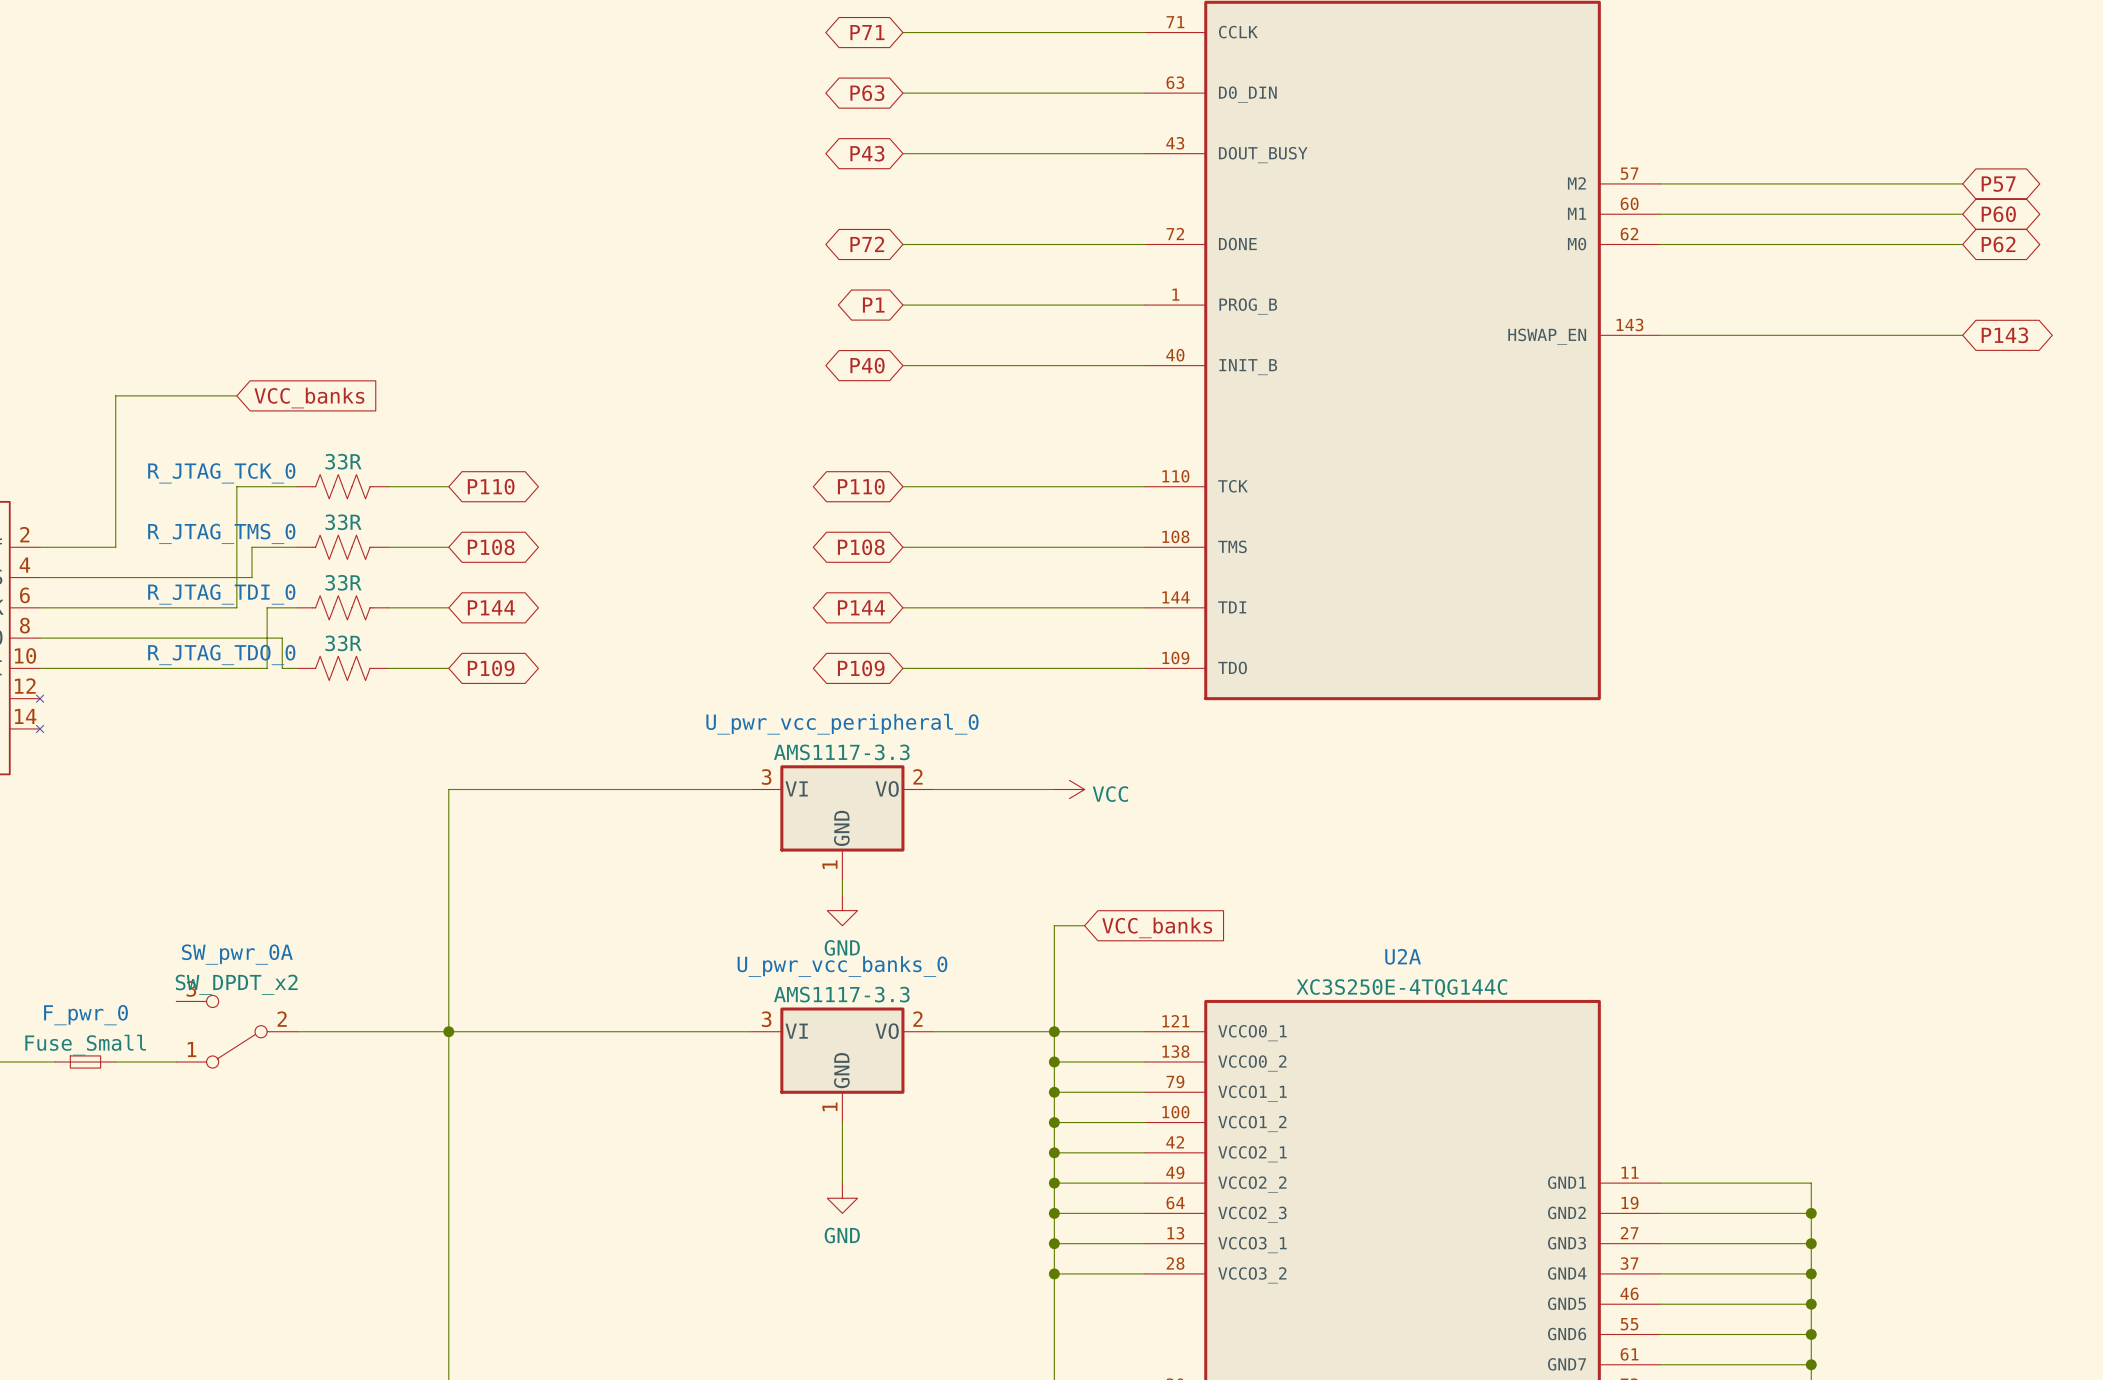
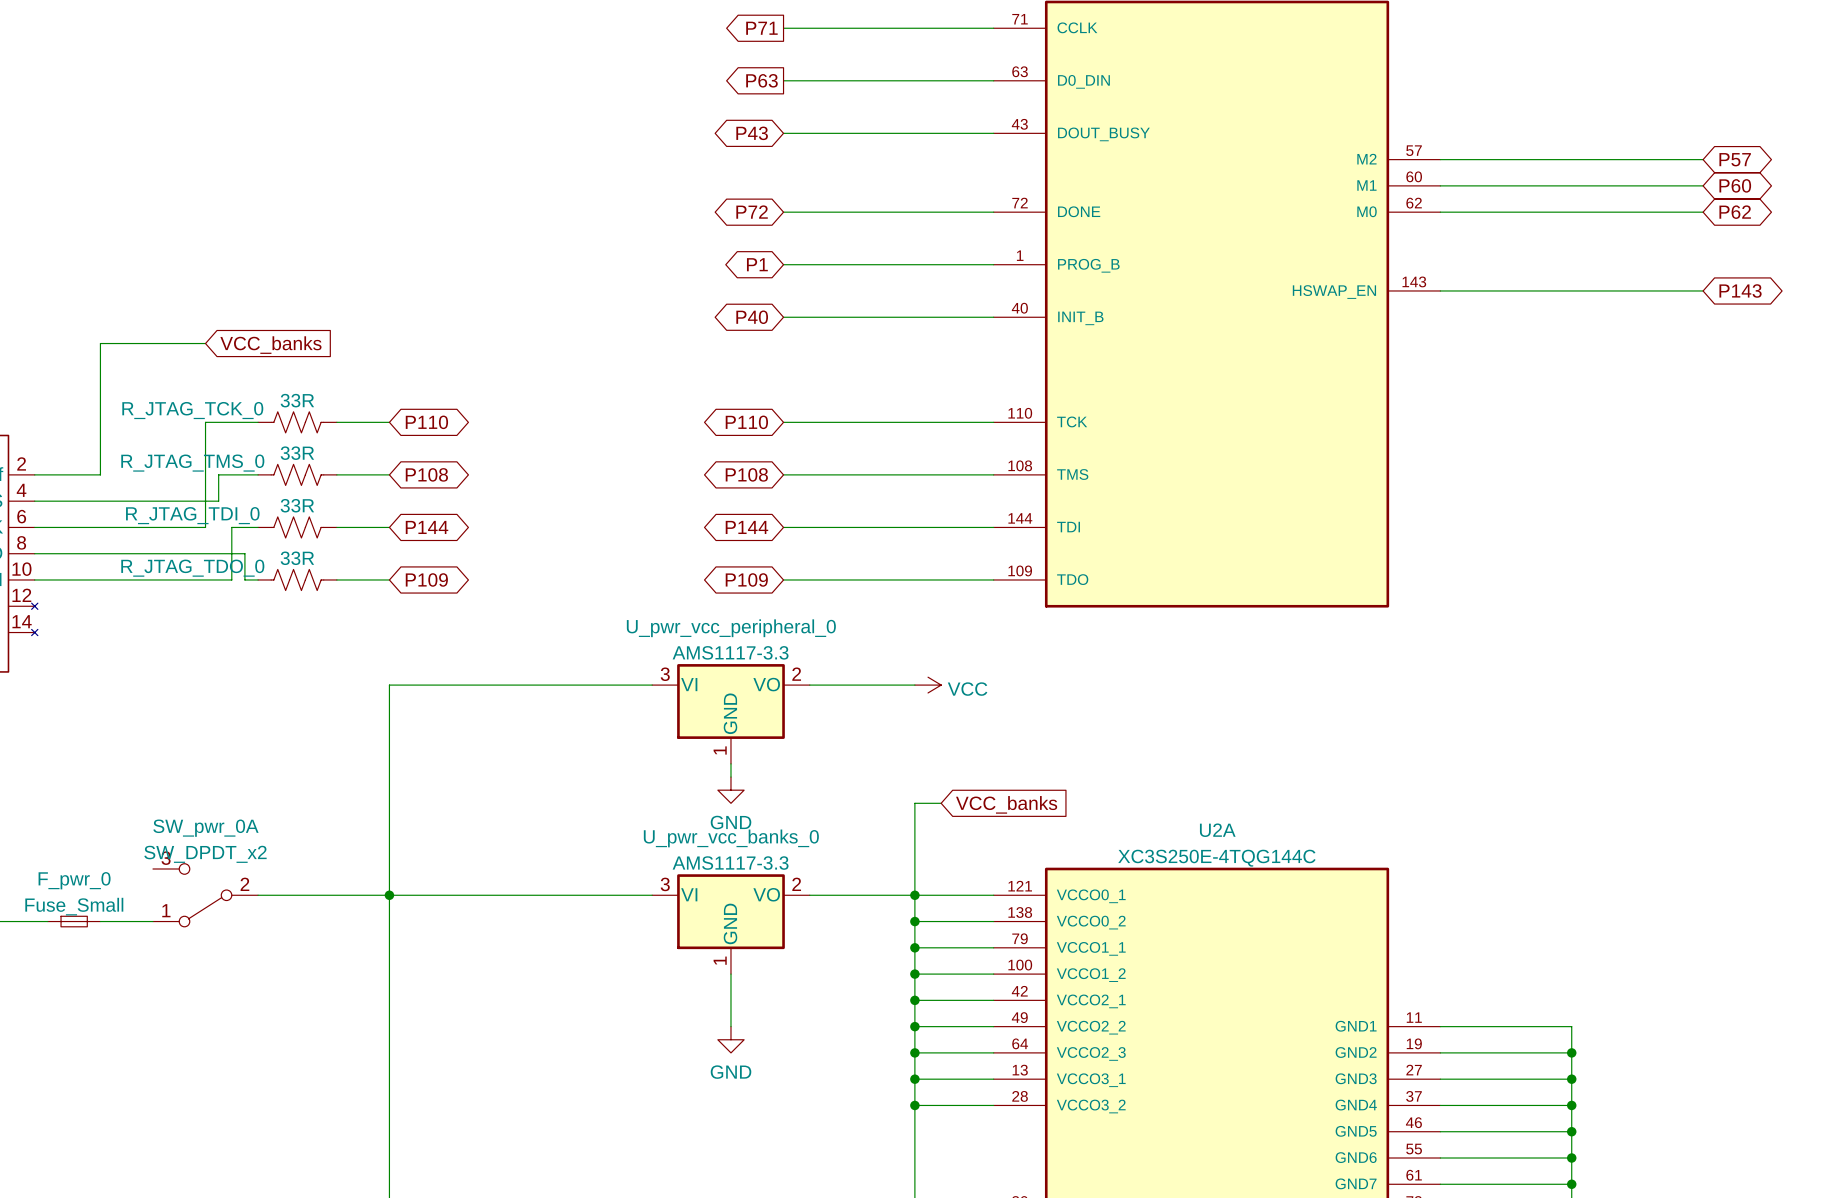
global label shape: bidirectional (867, 32) -> output (761, 28)
global label shape: bidirectional (867, 93) -> output (761, 80)

